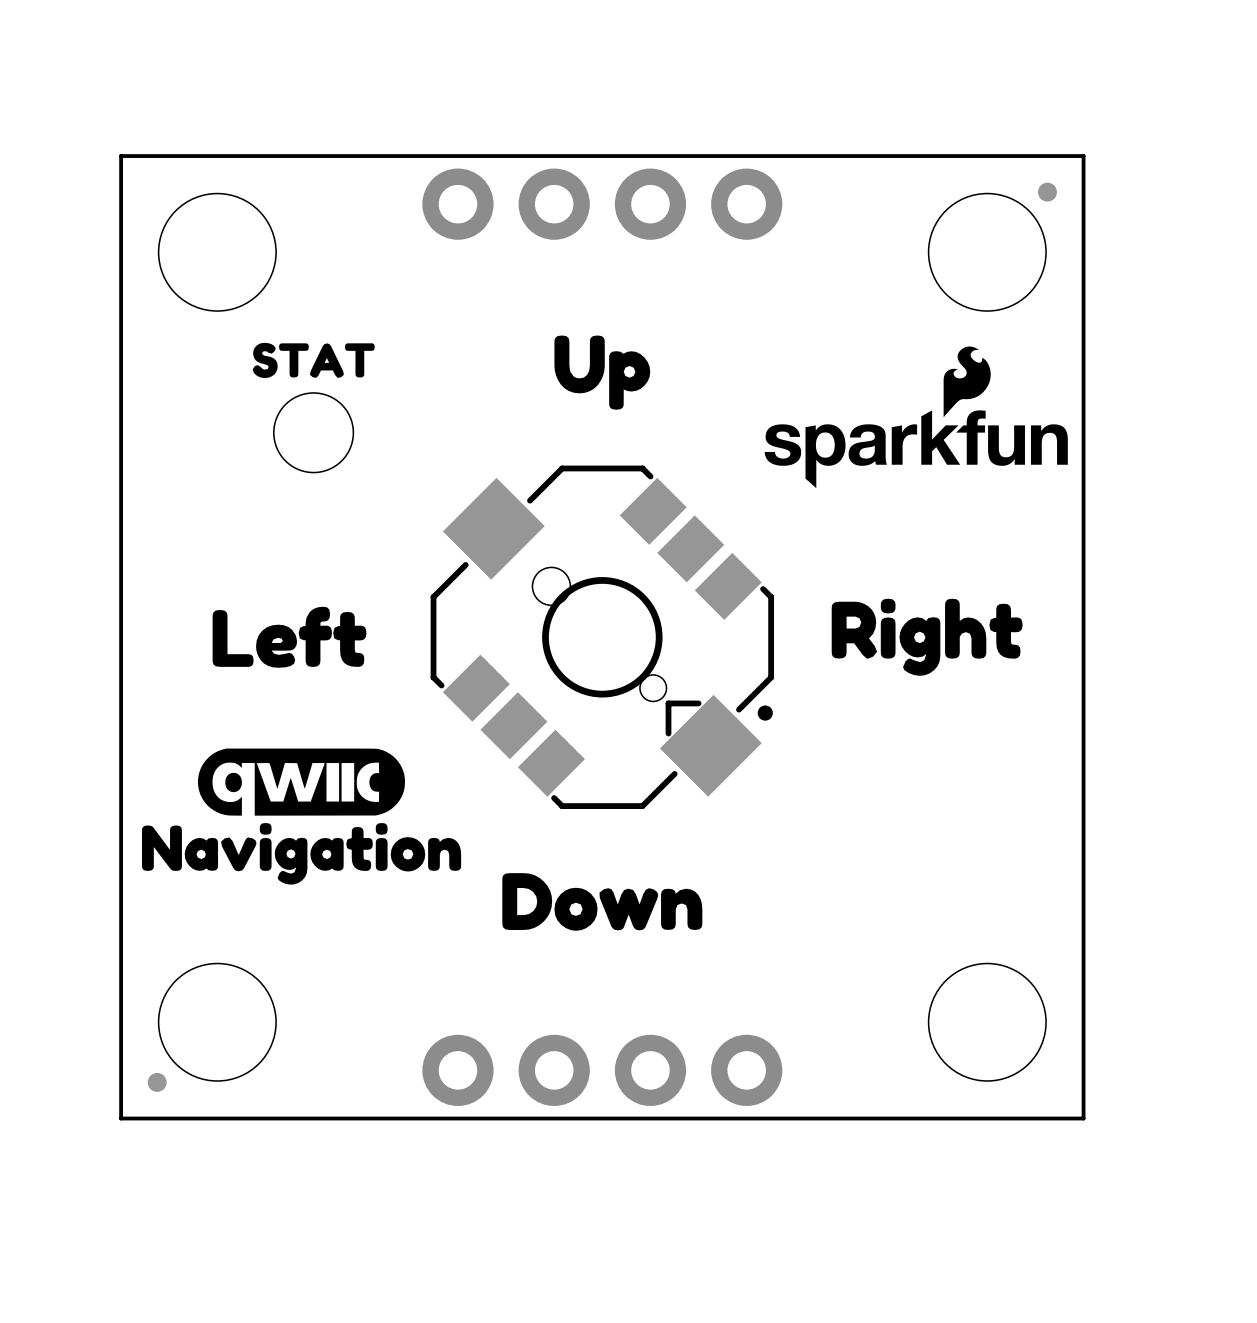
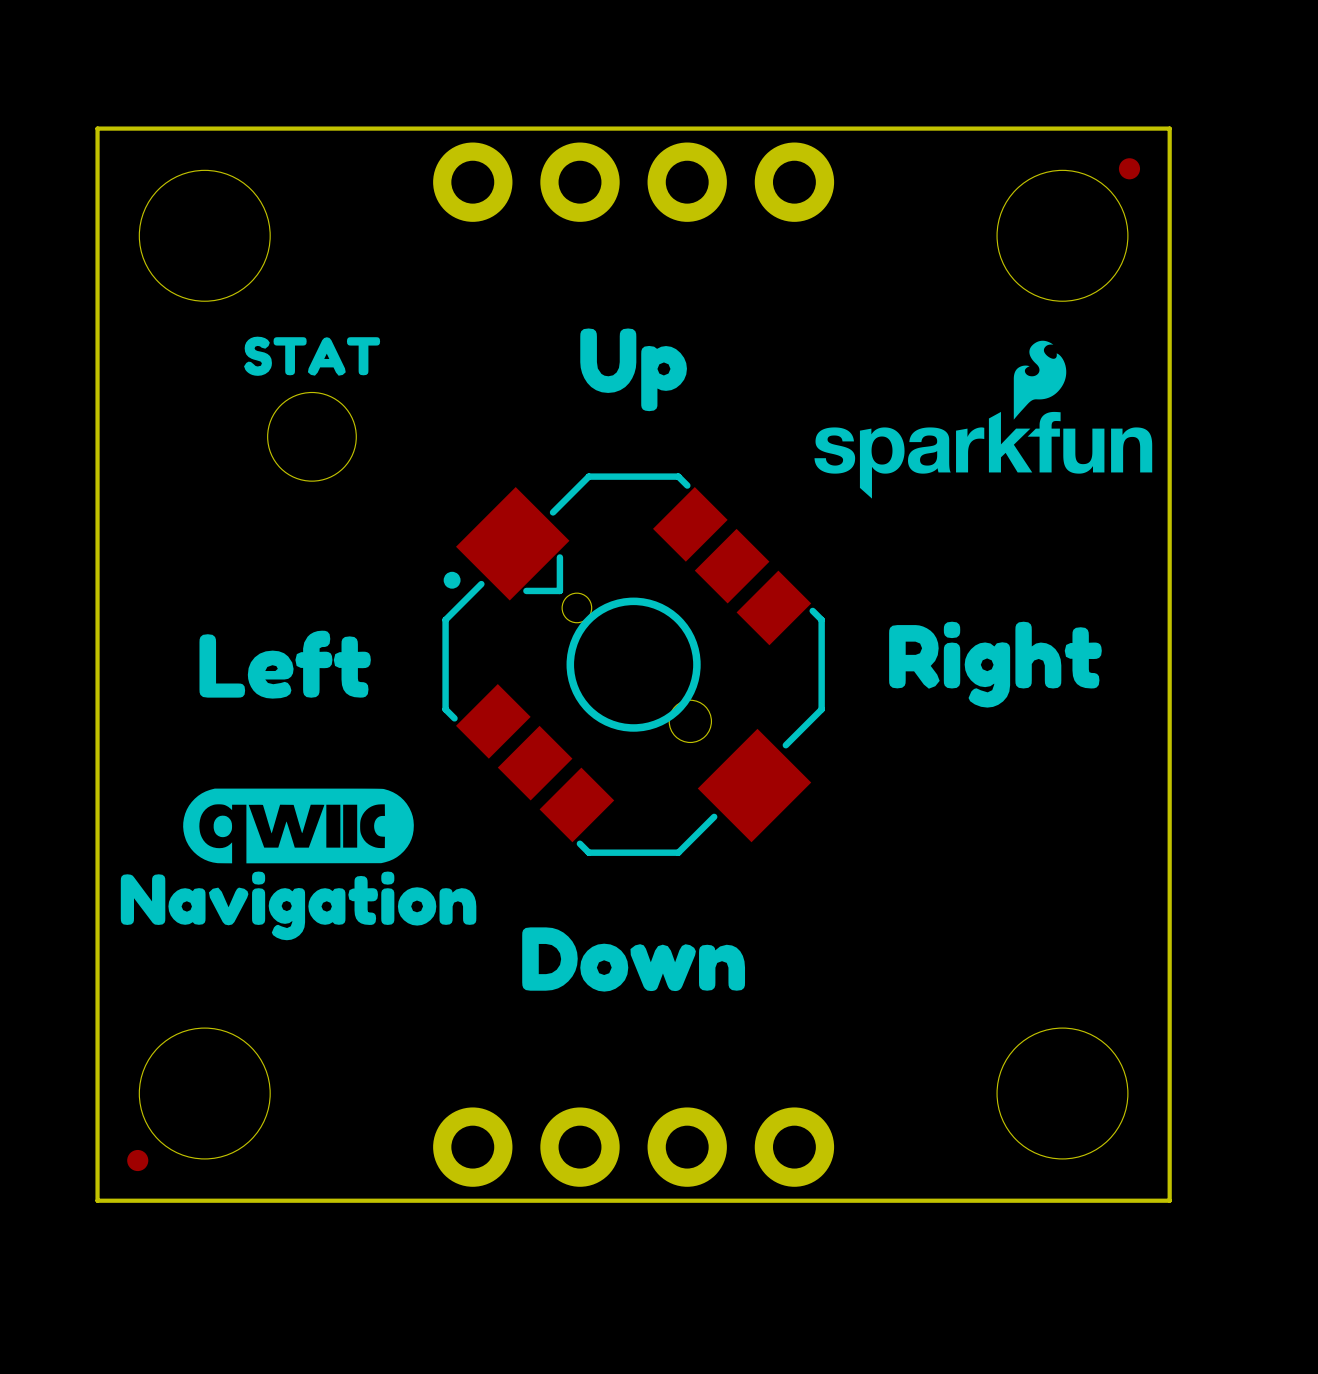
part rotation: 0° (602, 637) -> 180° (633, 664)

